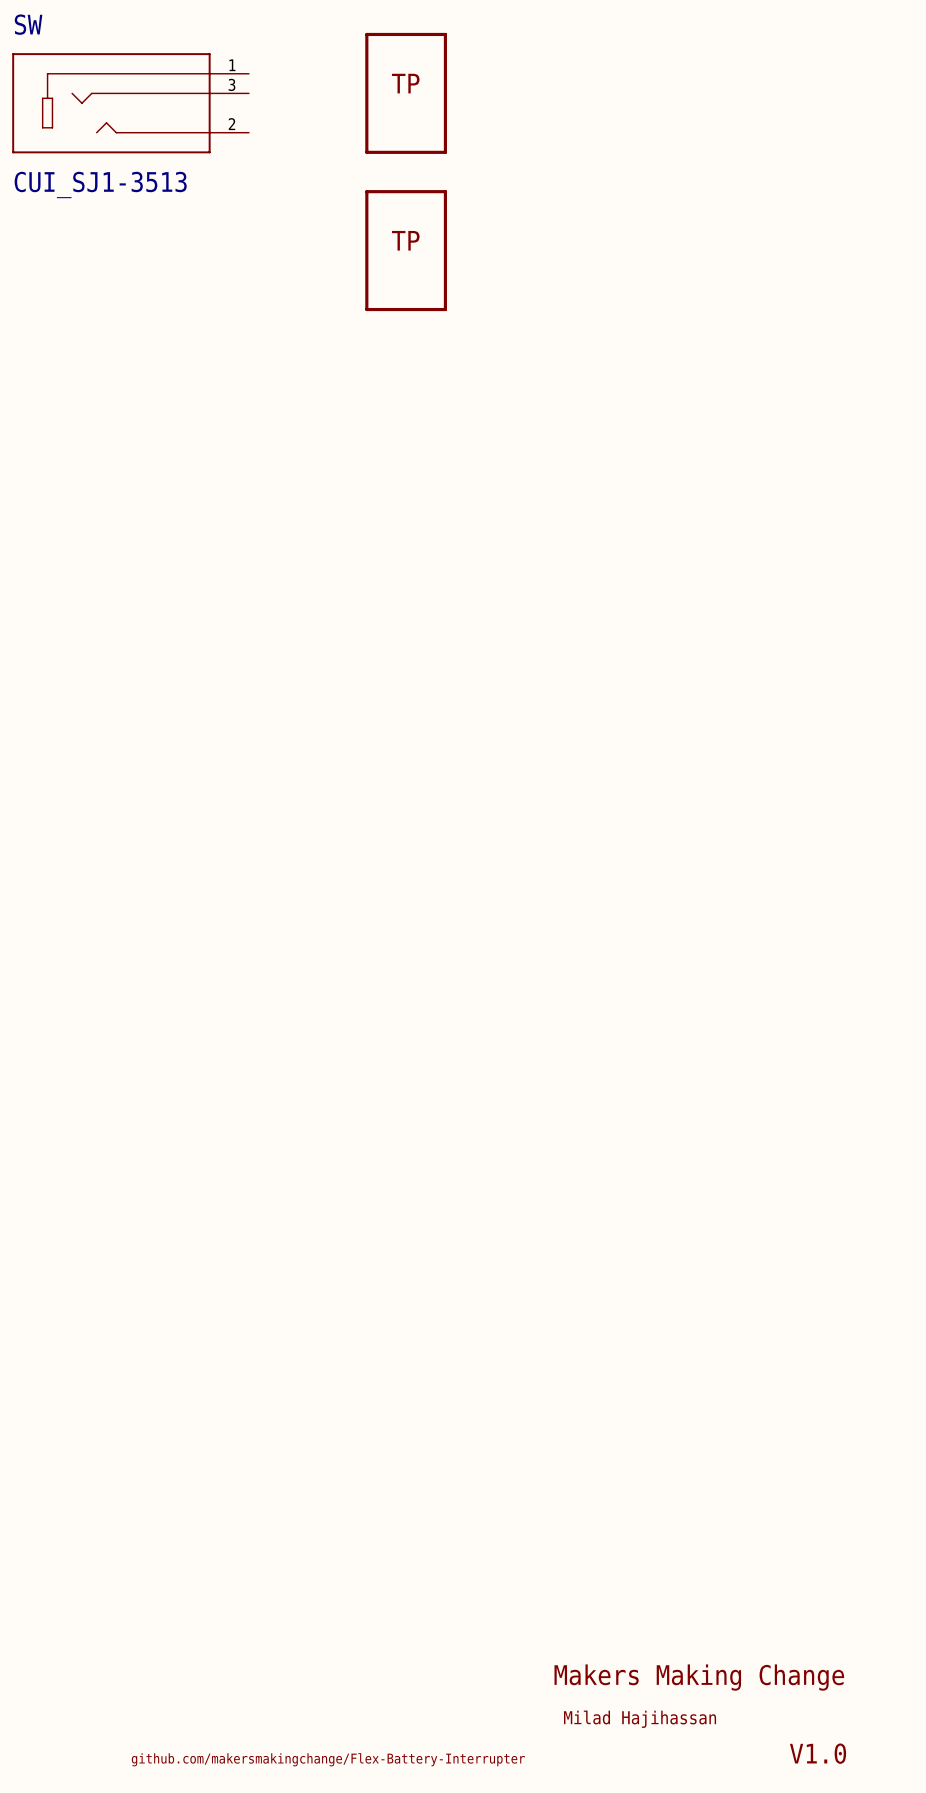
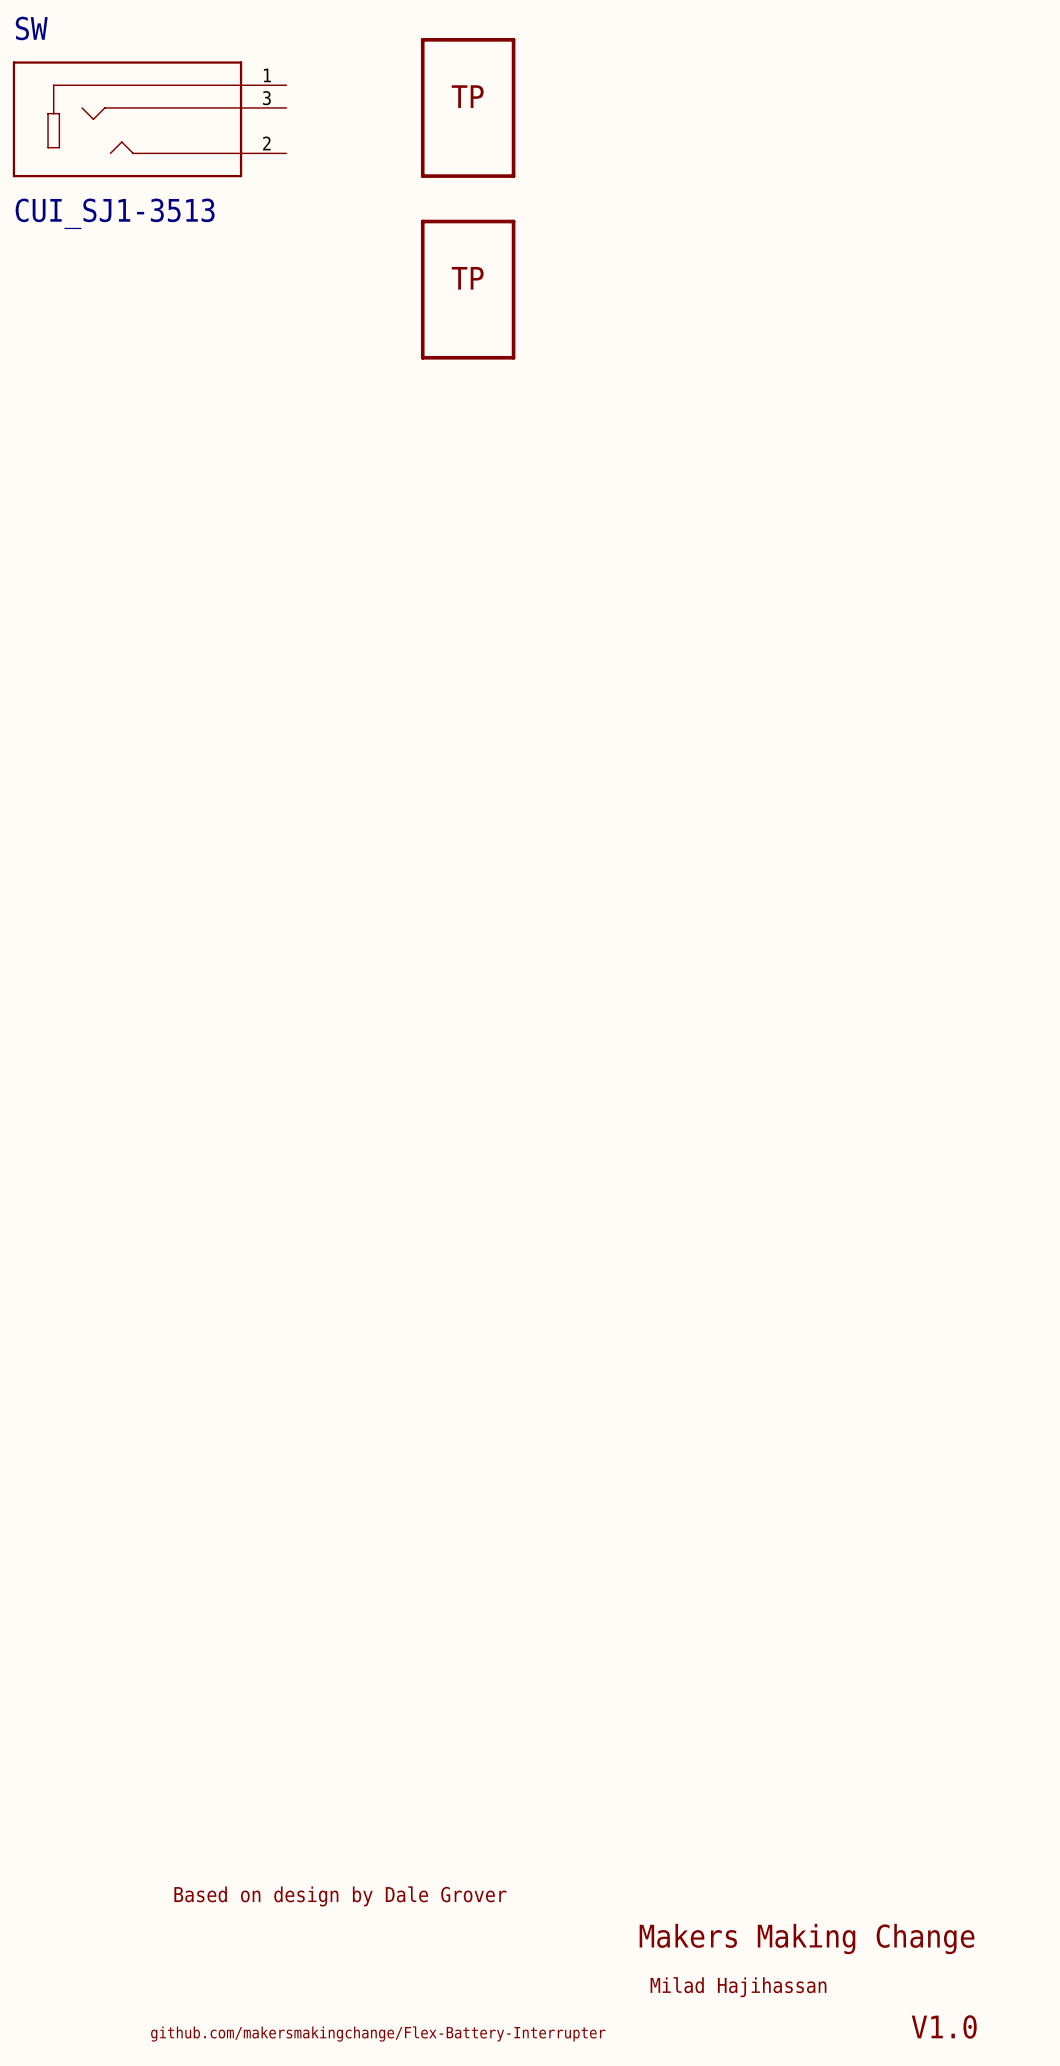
text: none -> Based on design by Dale Grover (340, 1896)

